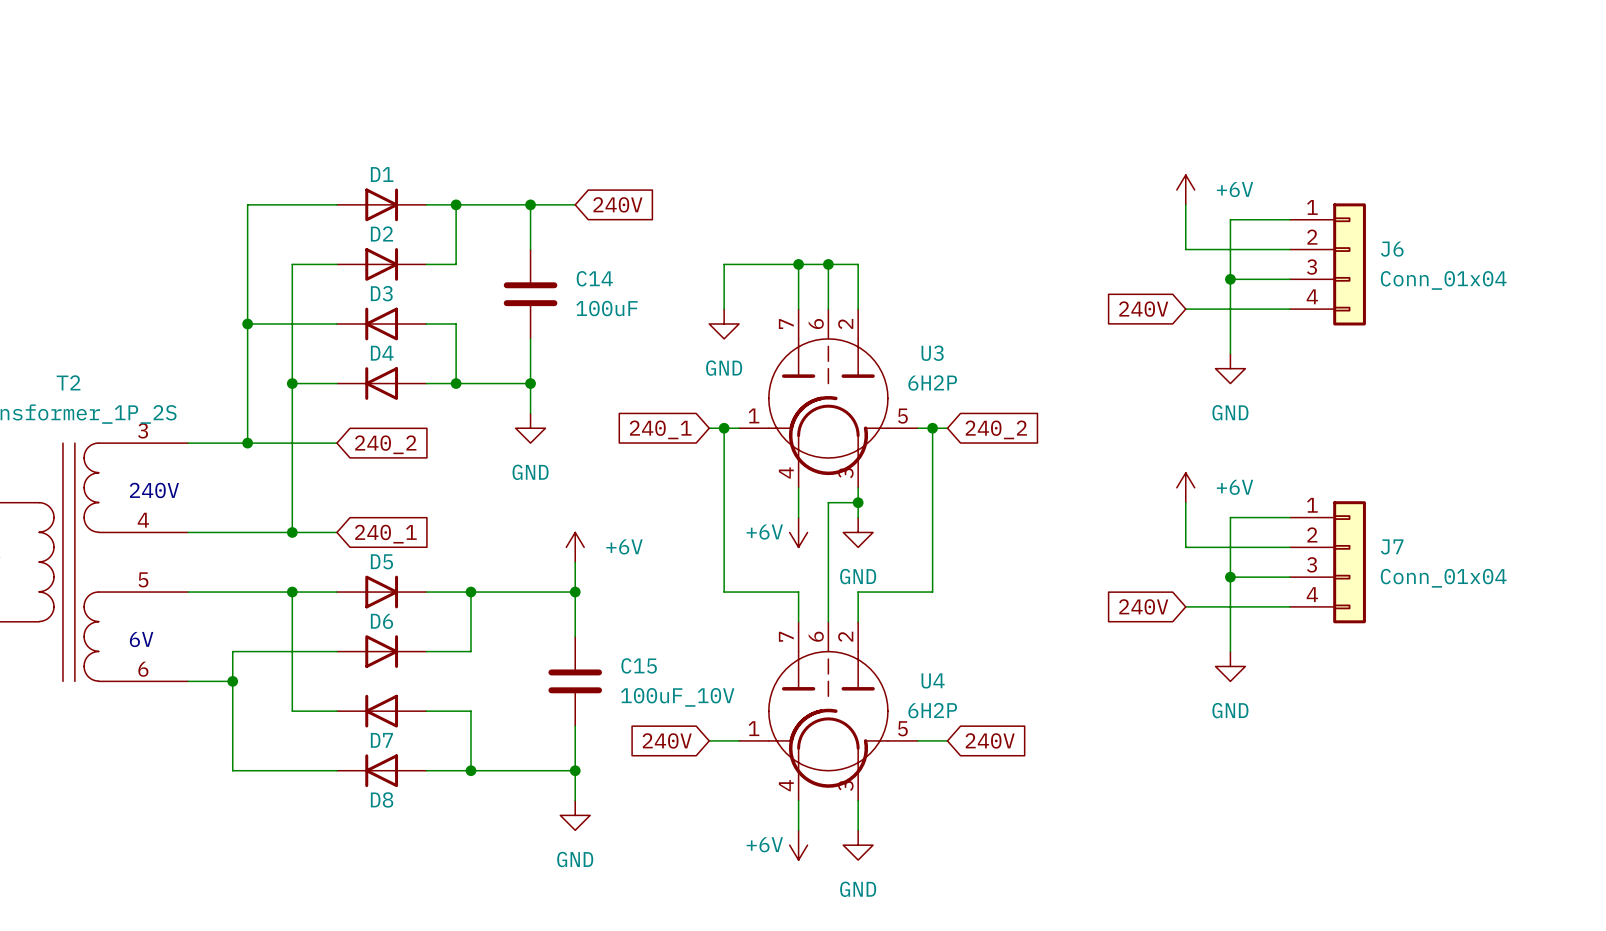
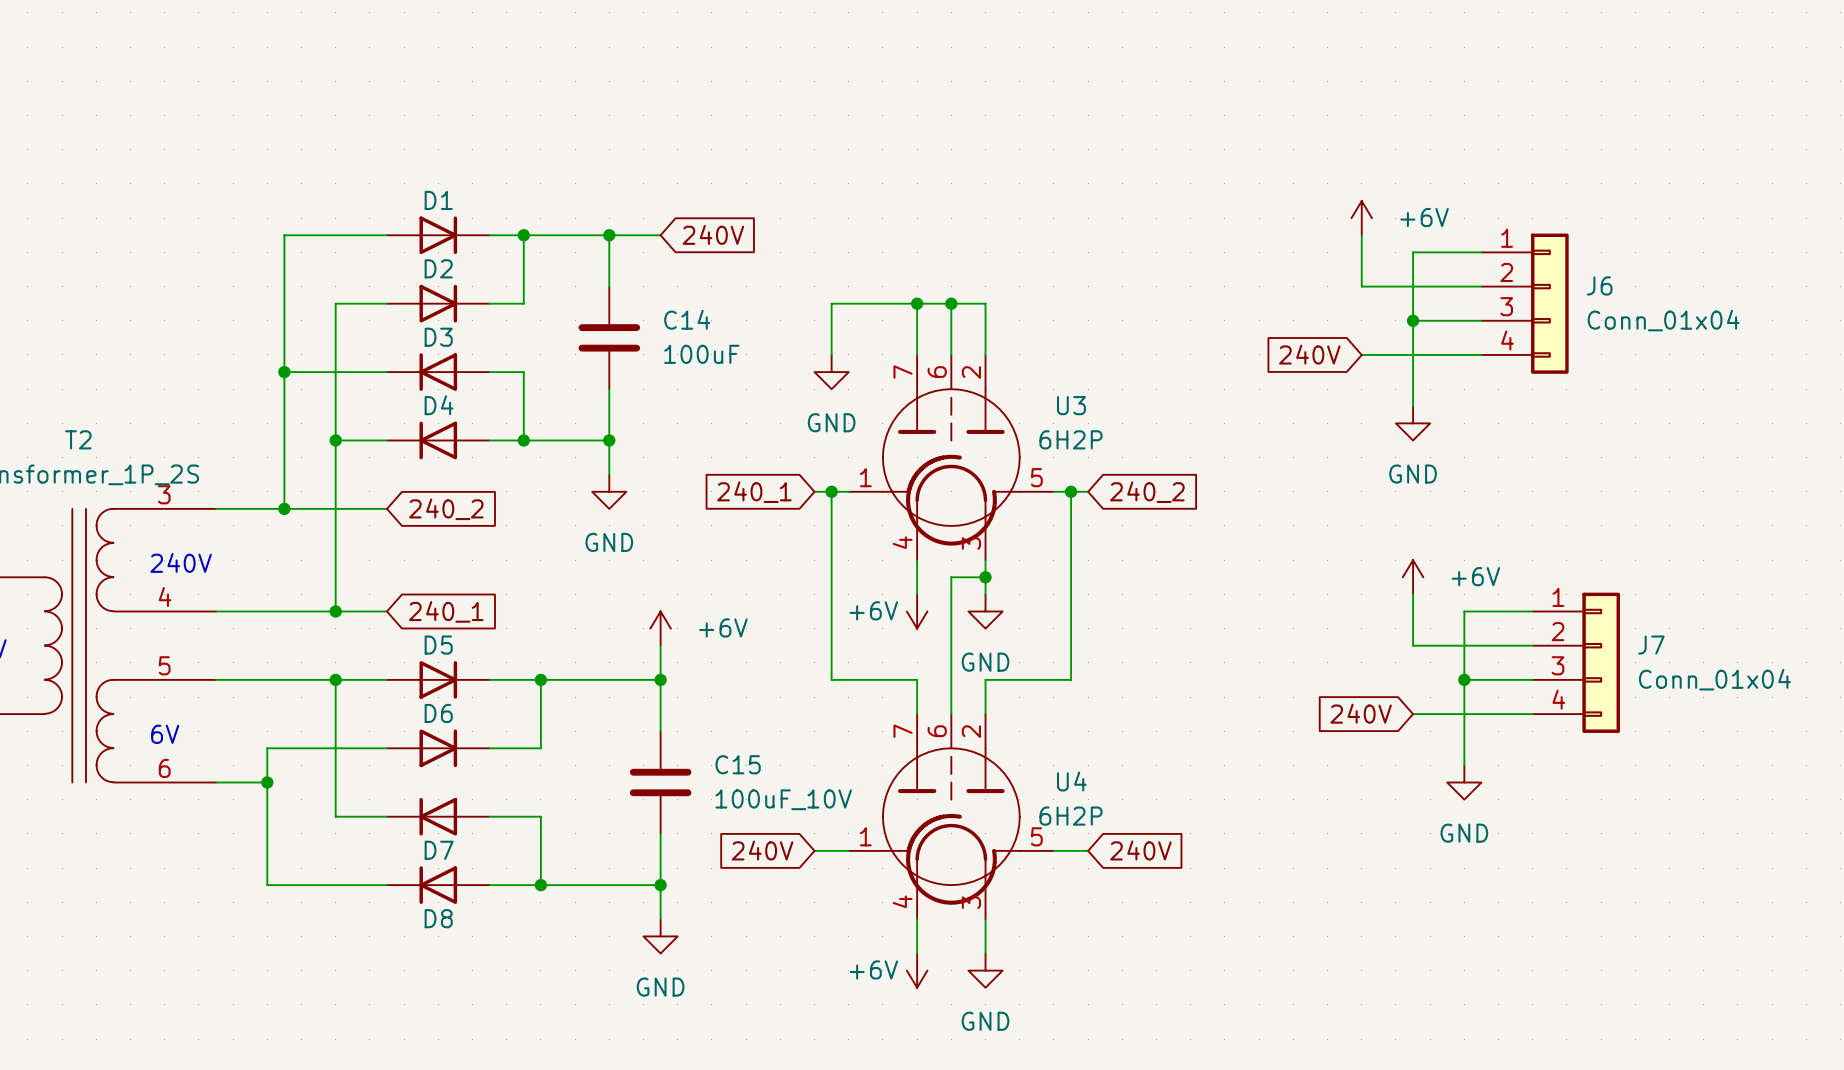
power symbol position: +6V (1185, 487) -> +6V (1413, 577)
wire: (1185, 502) (1185, 547) (1289, 547) -> none
wire: (1230, 517) (1289, 517) -> none
wire: none -> (1532, 611) (1464, 611) (1464, 765)
wire: (1230, 562) (1230, 651) -> (1413, 645) (1532, 645)
J7 position: (1327, 562) -> (1576, 662)
wire: (1230, 577) (1289, 577) -> (1464, 679) (1532, 679)
junction position: (1230, 577) -> (1464, 679)
global label position: 240V (1143, 606) -> 240V (1361, 713)
wire: (1185, 606) (1289, 606) -> (1413, 714) (1532, 714)
power symbol position: GND (1230, 666) -> GND (1464, 782)

